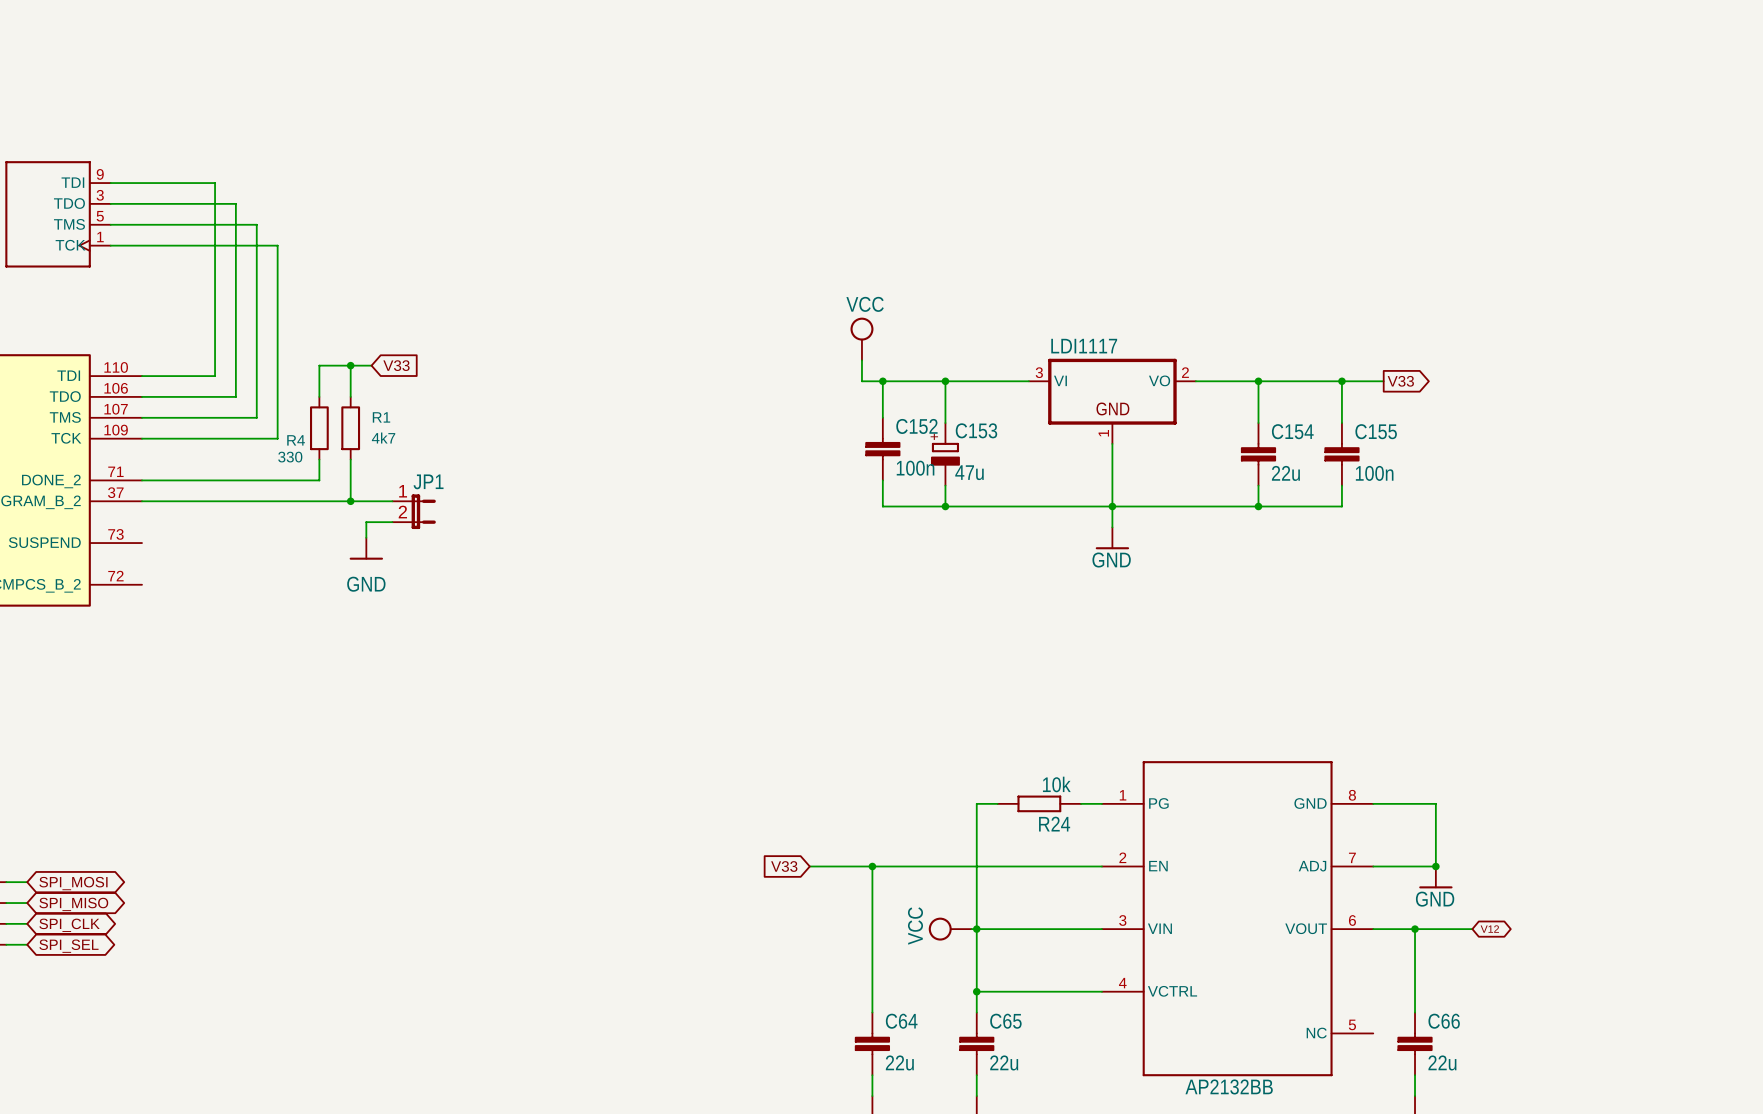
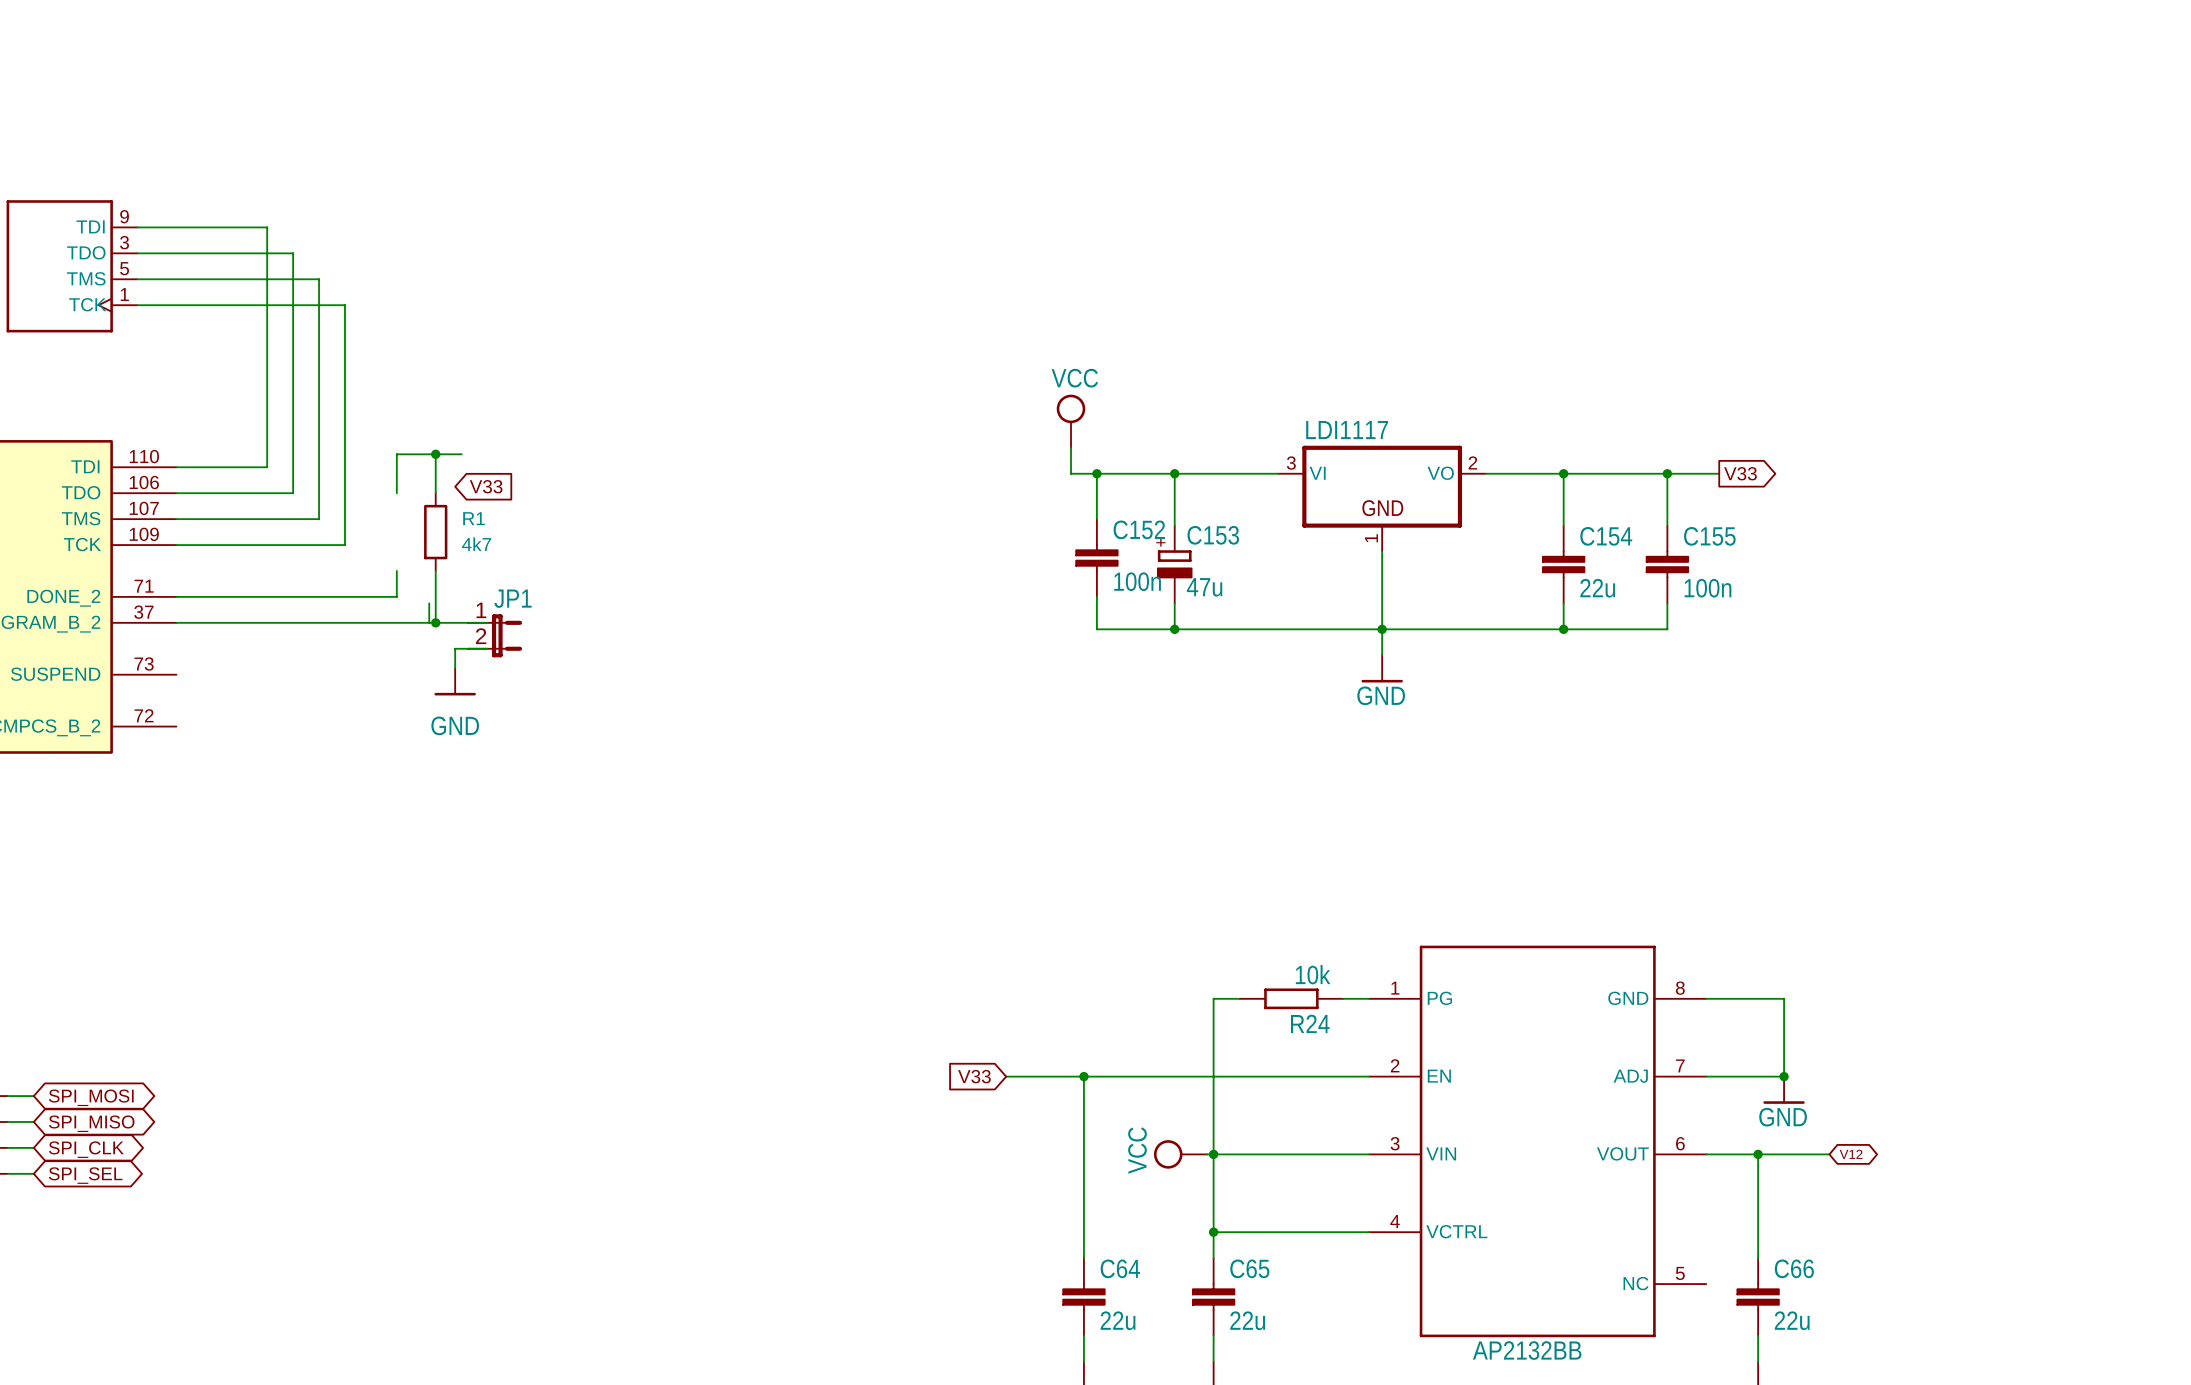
global label position: V33 (396, 365) -> V33 (486, 486)
R4: 330 (319, 428) -> none
wire: none -> (429, 603) (429, 622)
JP1 position: (414, 511) -> (495, 635)

